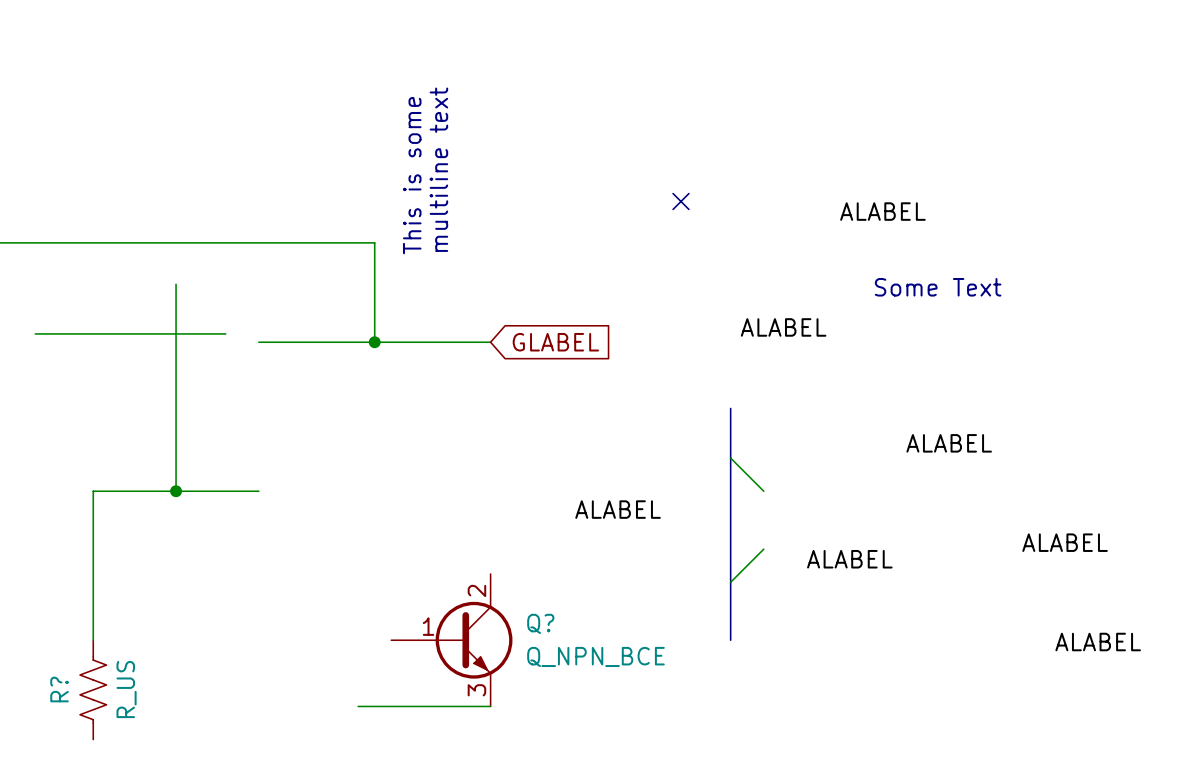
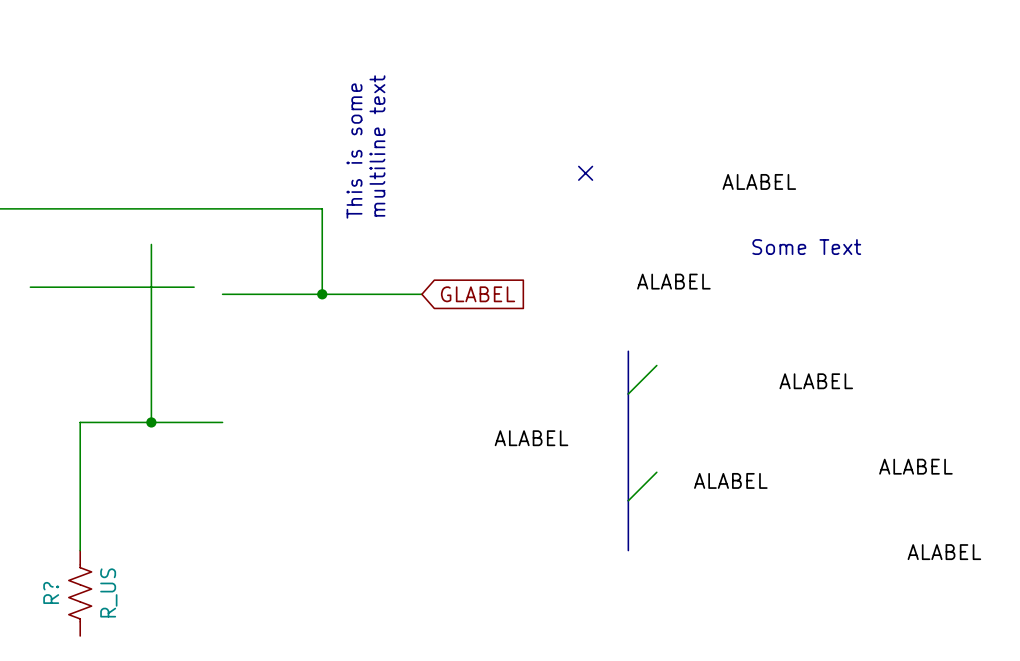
wire: (730, 458) (763, 491) -> (628, 393) (656, 365)
Q?: Q_NPN_BCE (451, 640) -> none
wire: (358, 706) (490, 706) -> none

